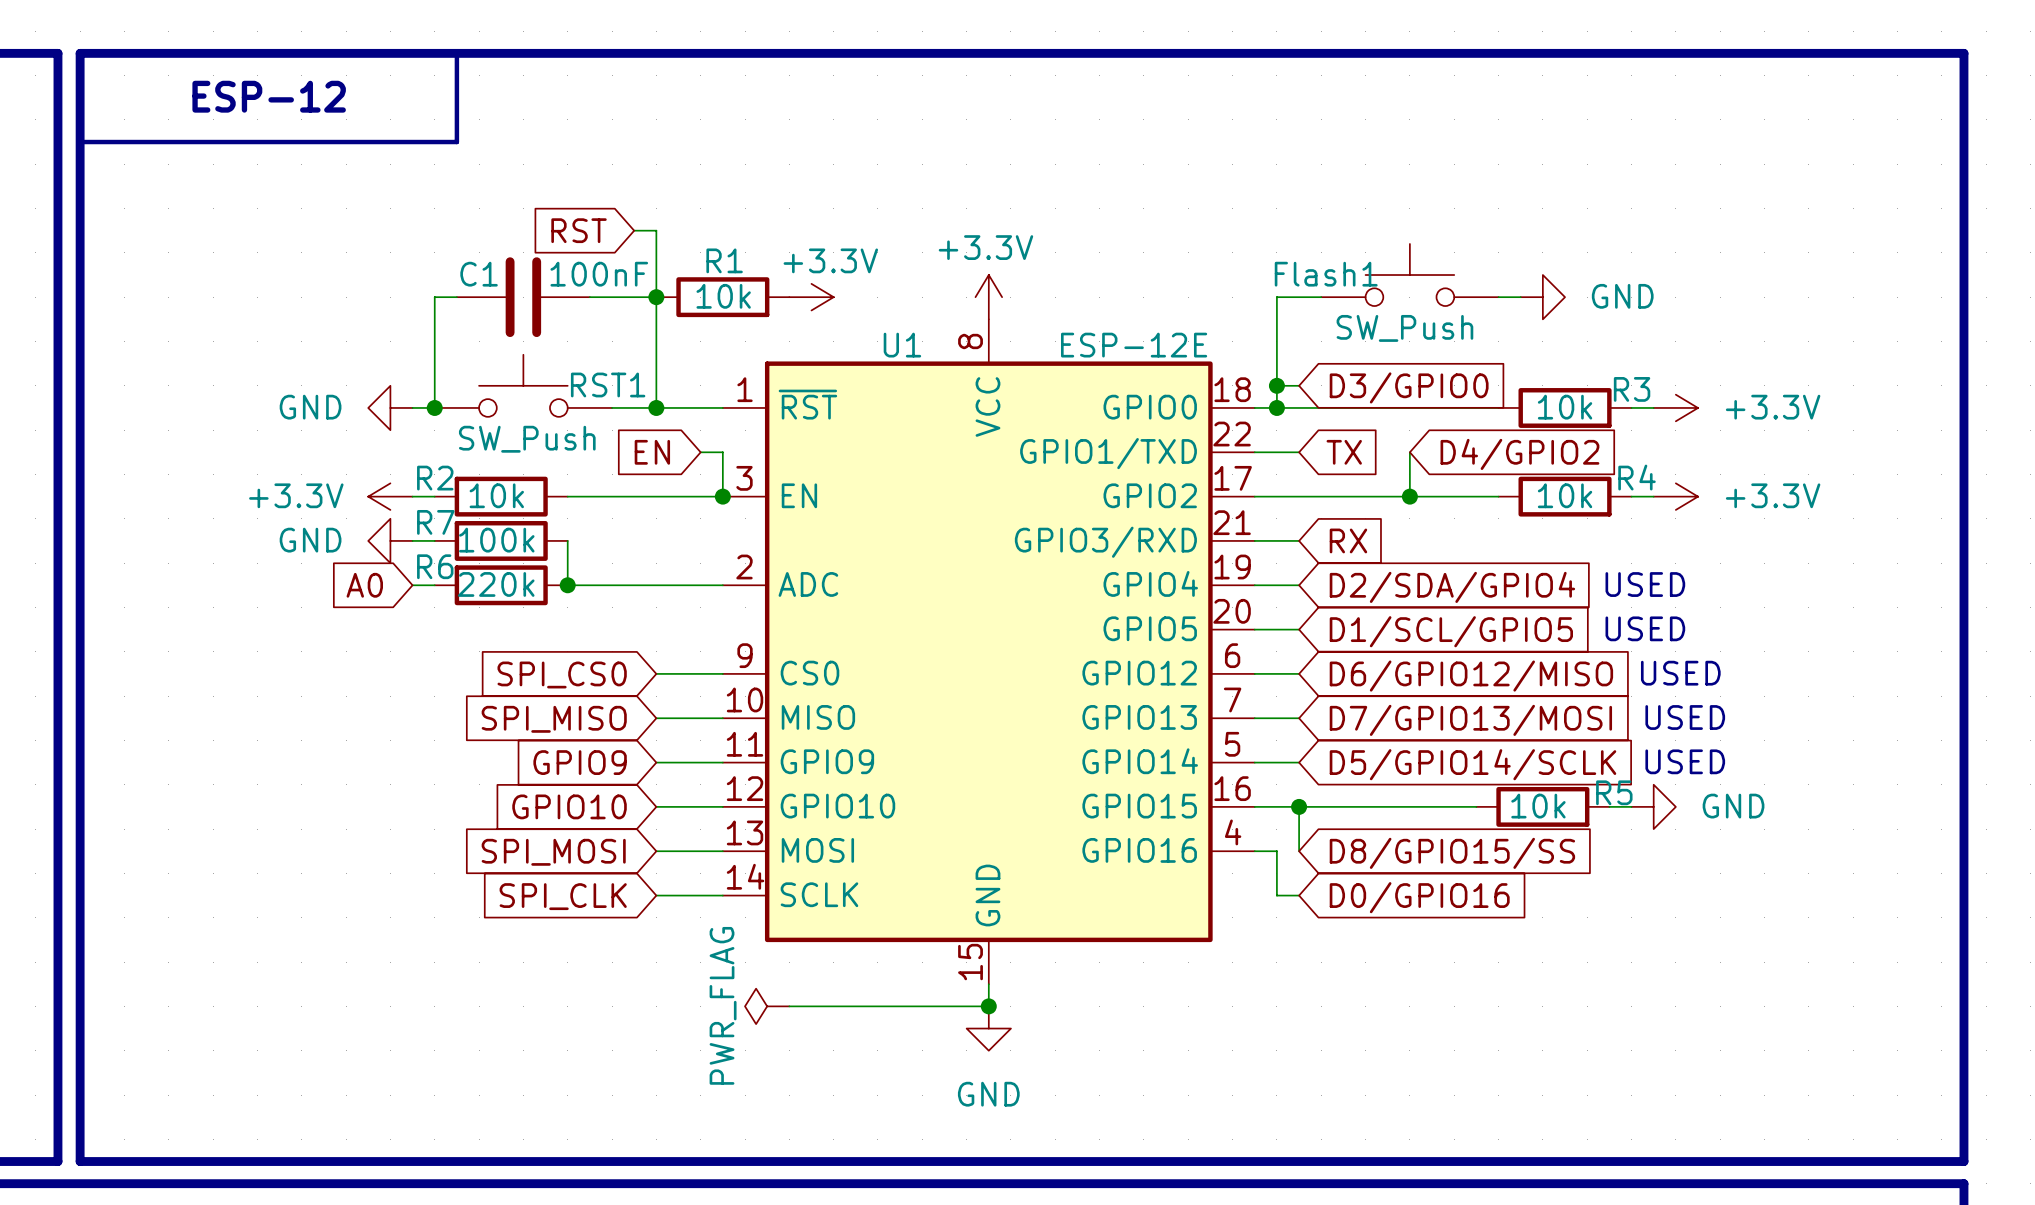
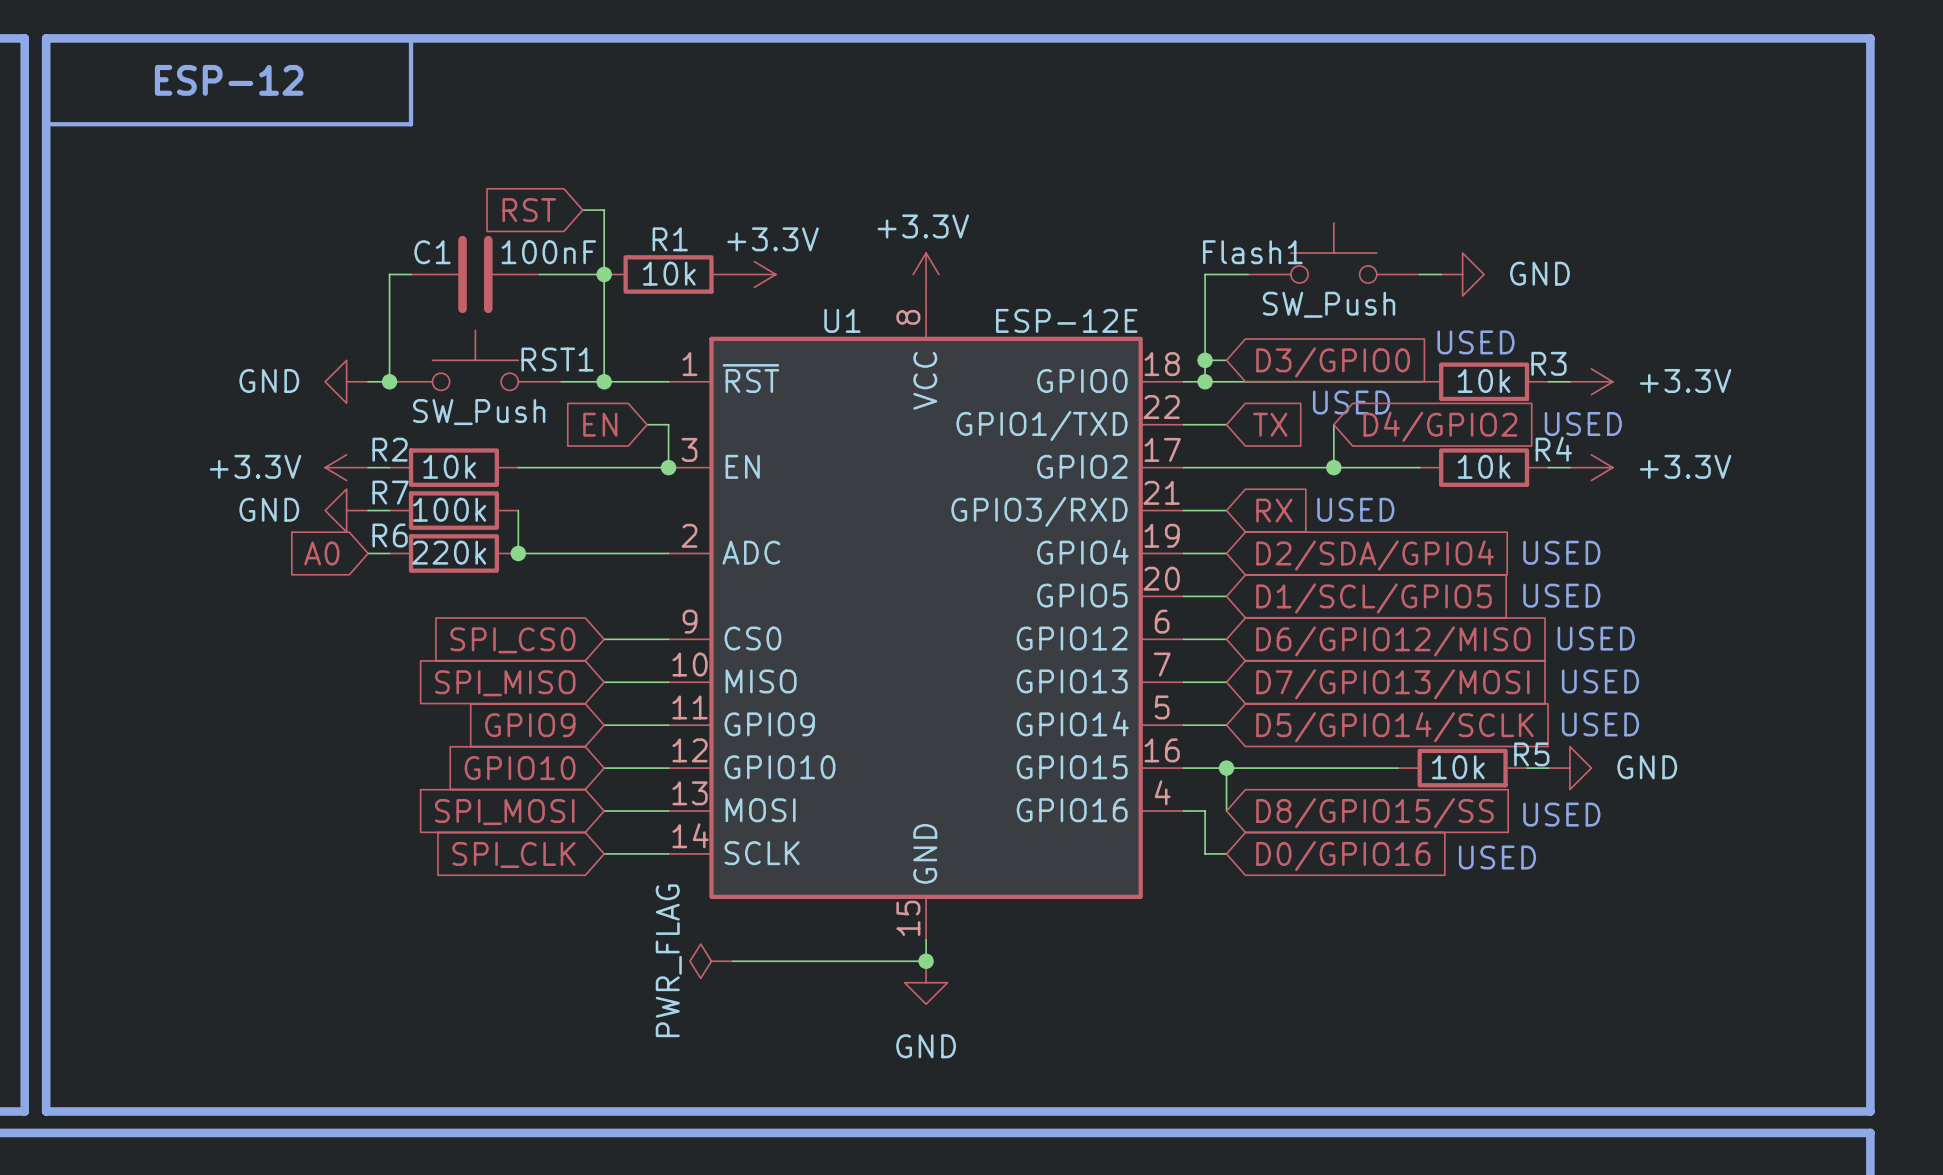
text: none -> USED (1476, 342)
text: none -> USED (1351, 402)
text: none -> USED (1583, 423)
text: none -> USED (1355, 509)
text: none -> USED (1561, 814)
text: none -> USED (1497, 857)

